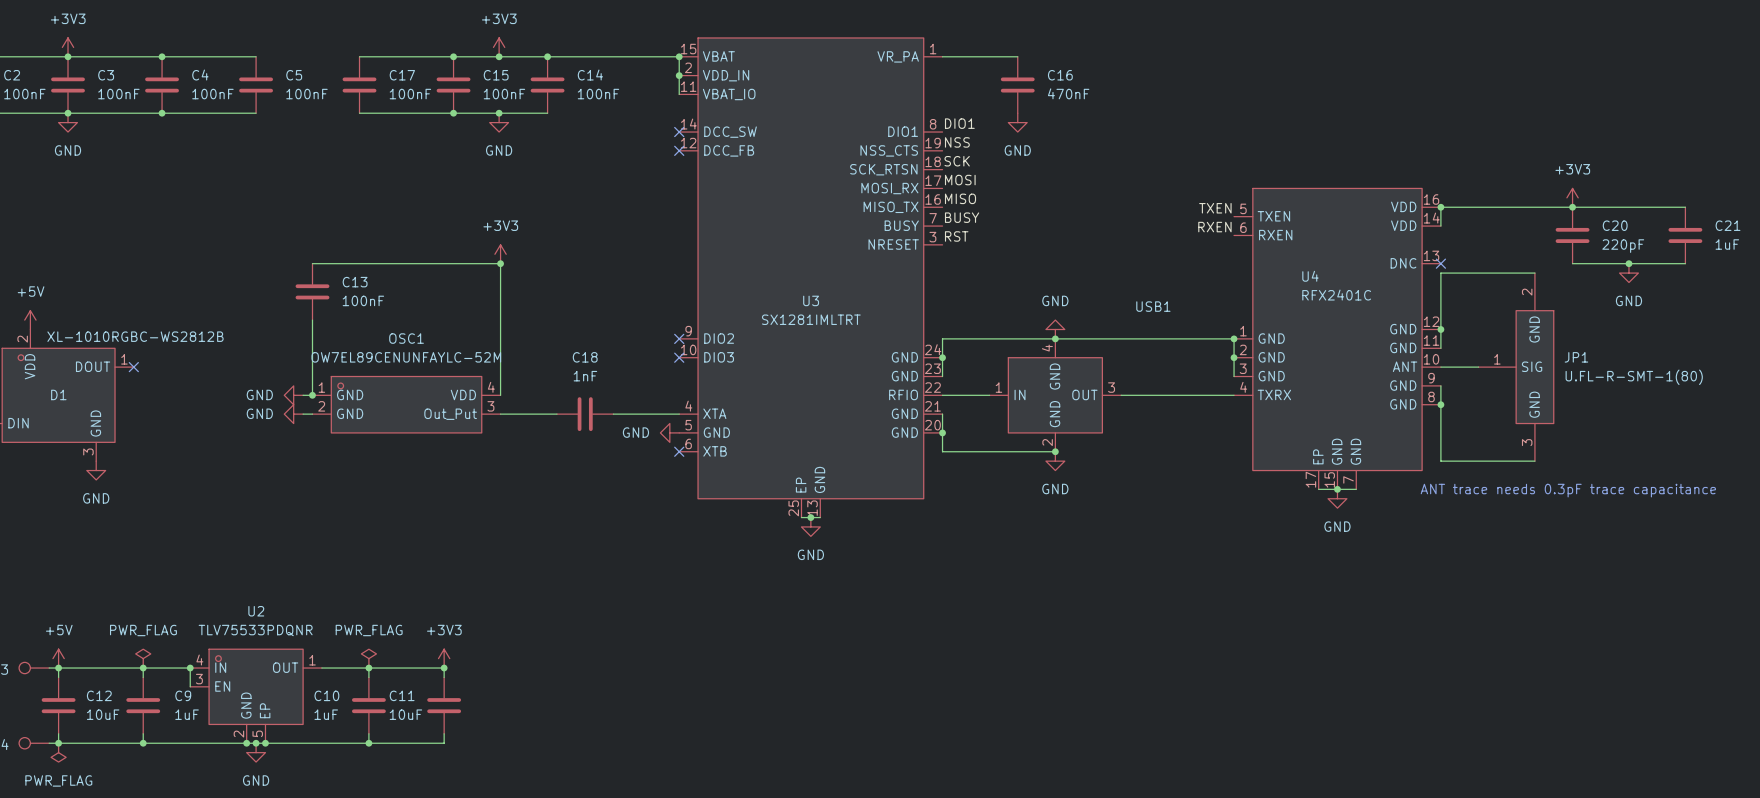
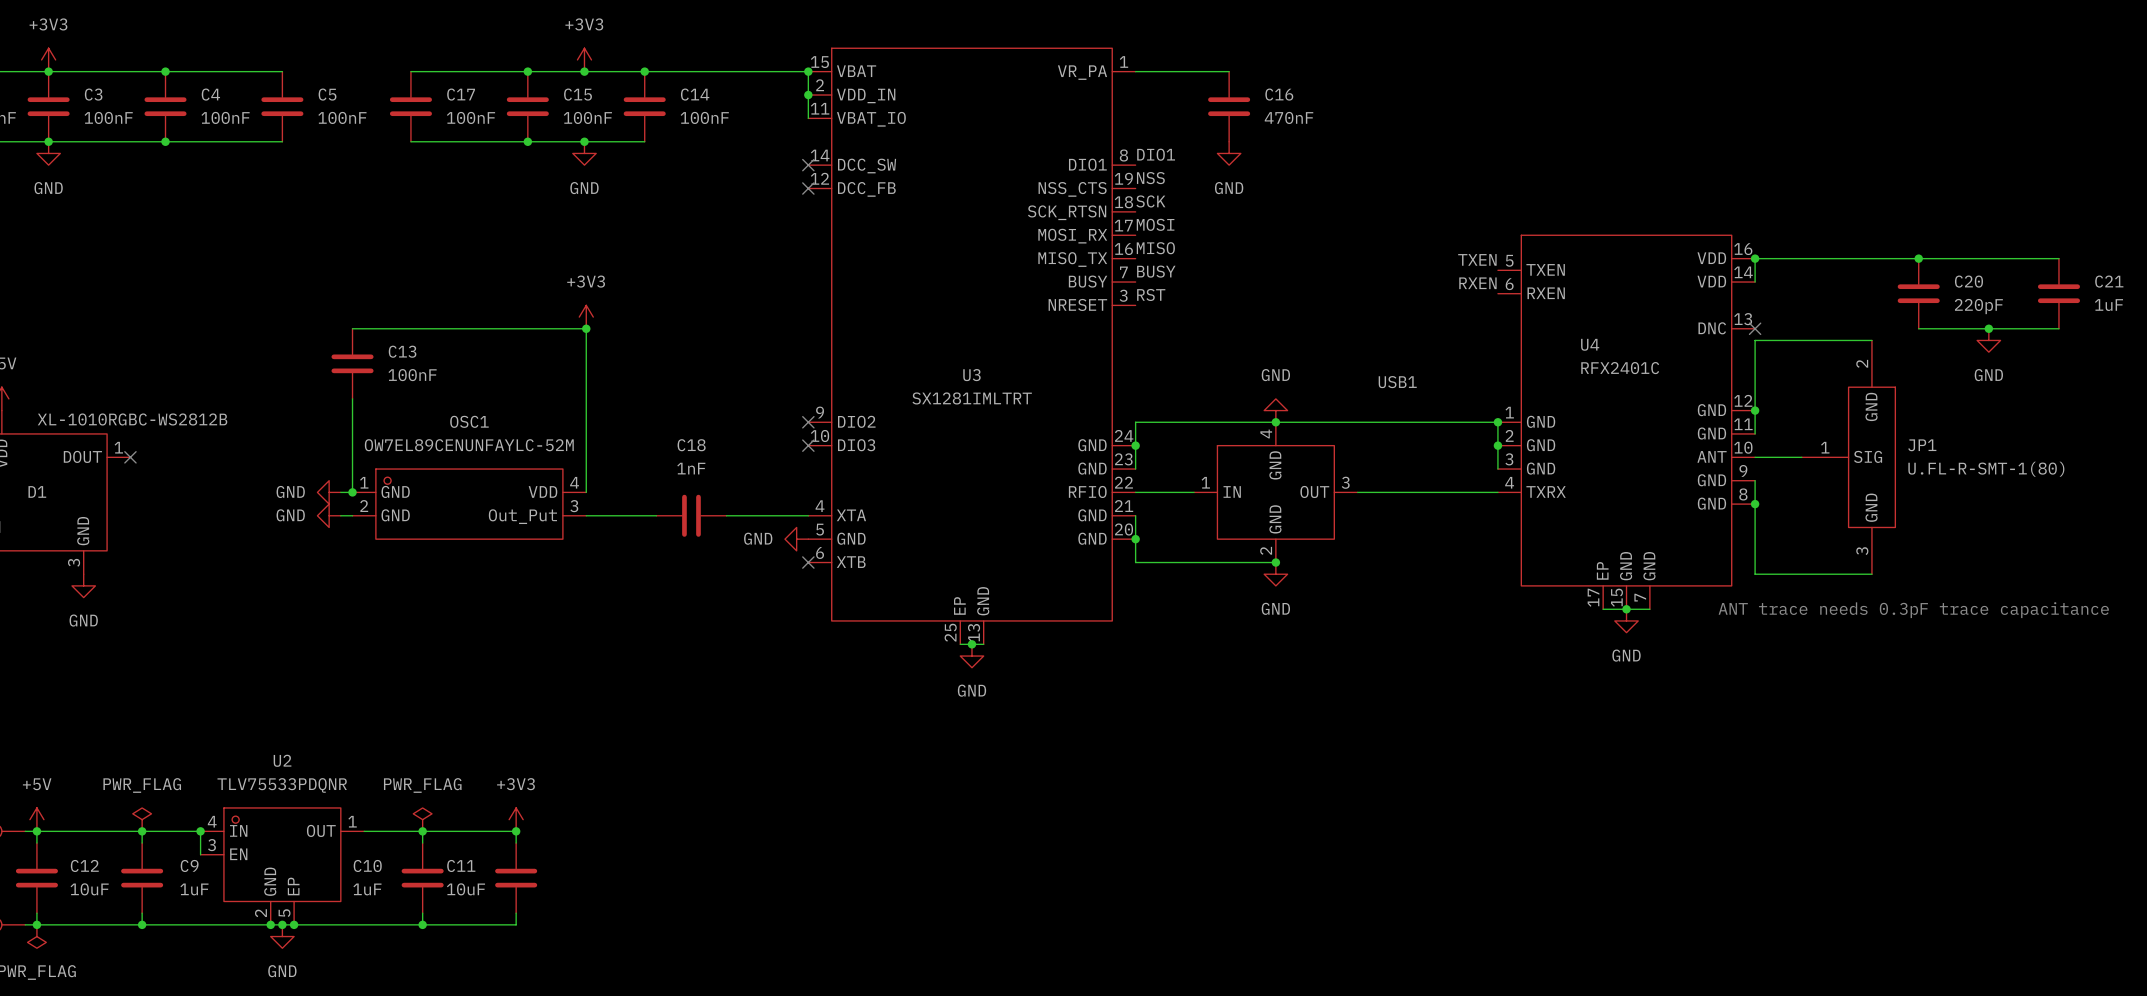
power symbol: +3V3 (1572, 197) -> none

